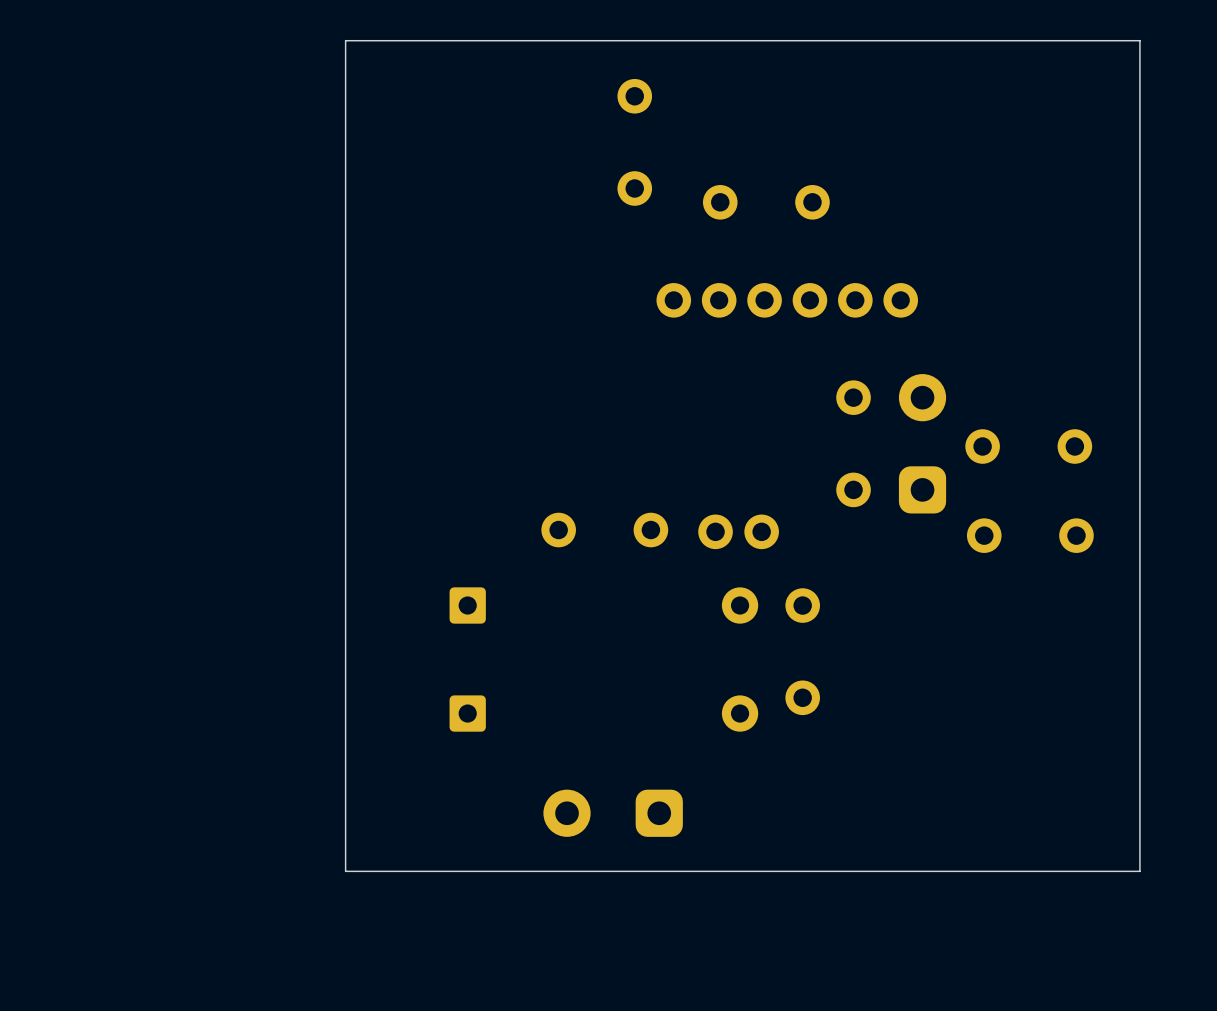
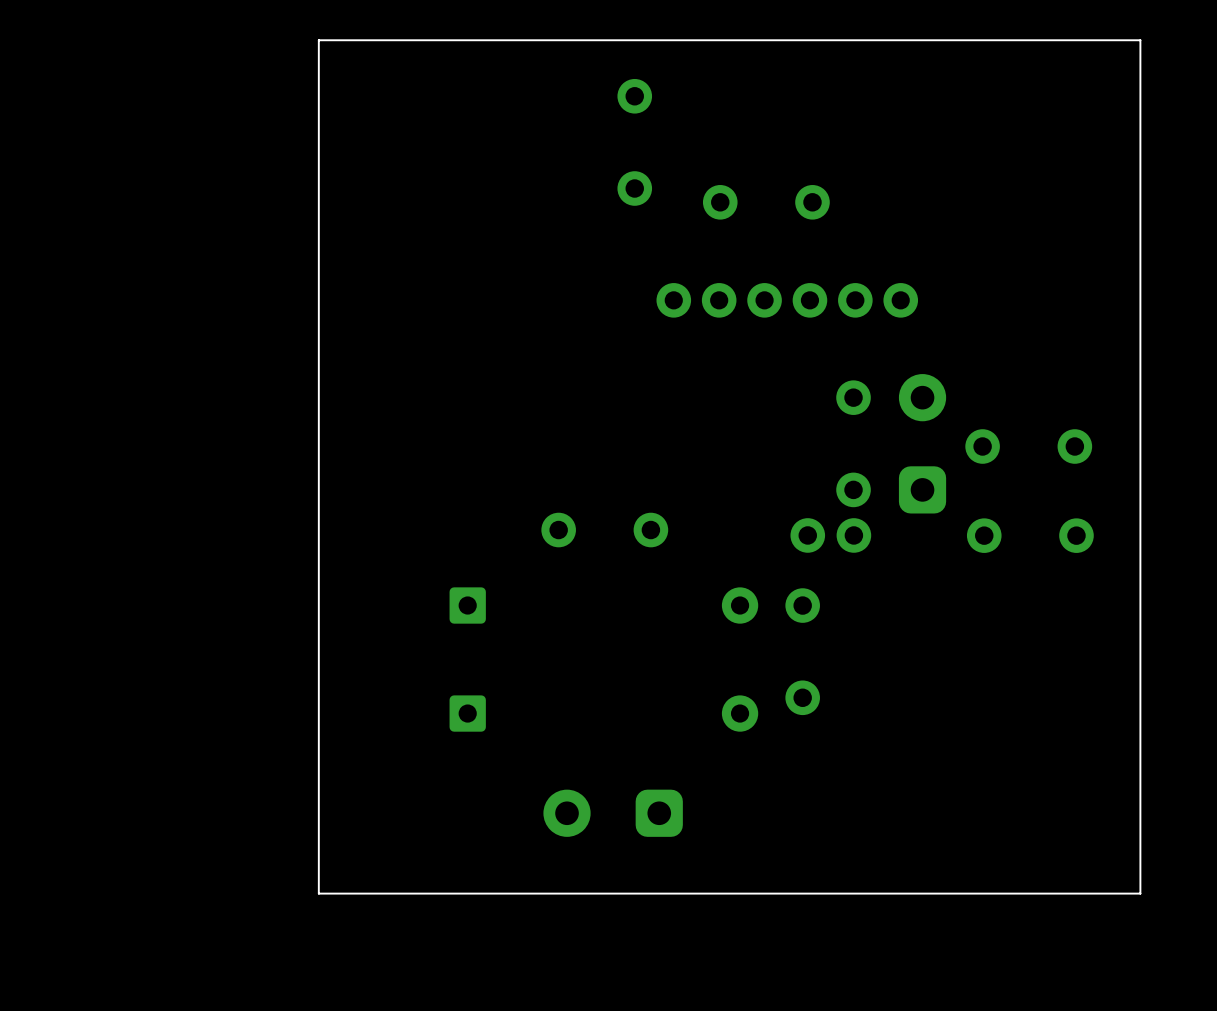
board edge: (1139, 40) (345, 40) (345, 871) (1139, 871) (1139, 40) -> (1140, 40) (1140, 893) (318, 893) (318, 40) (1140, 40)
part position: (738, 531) -> (830, 535)

